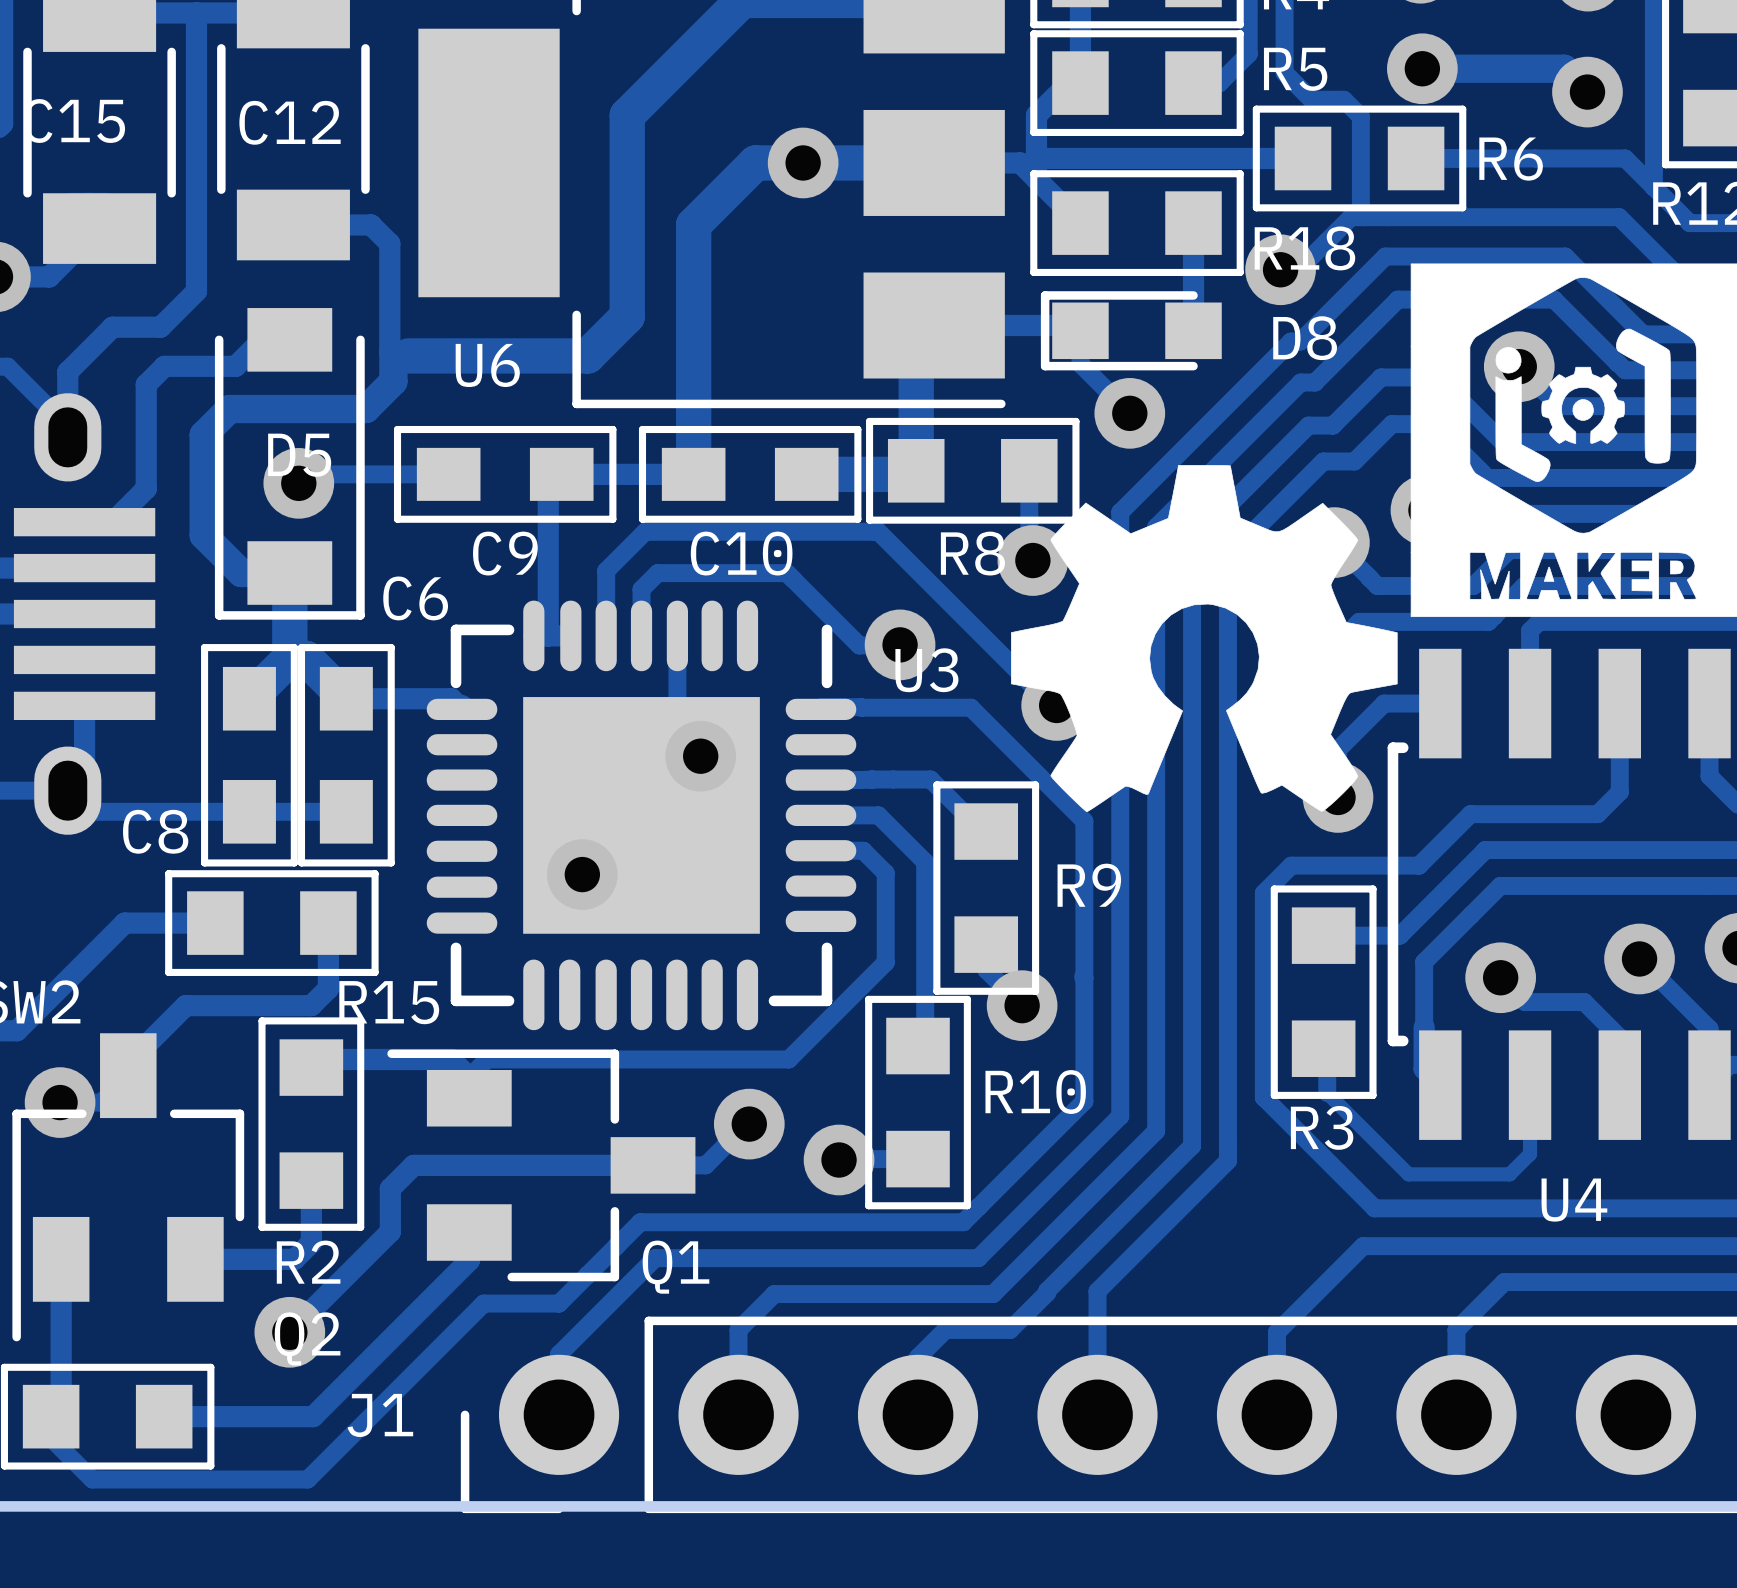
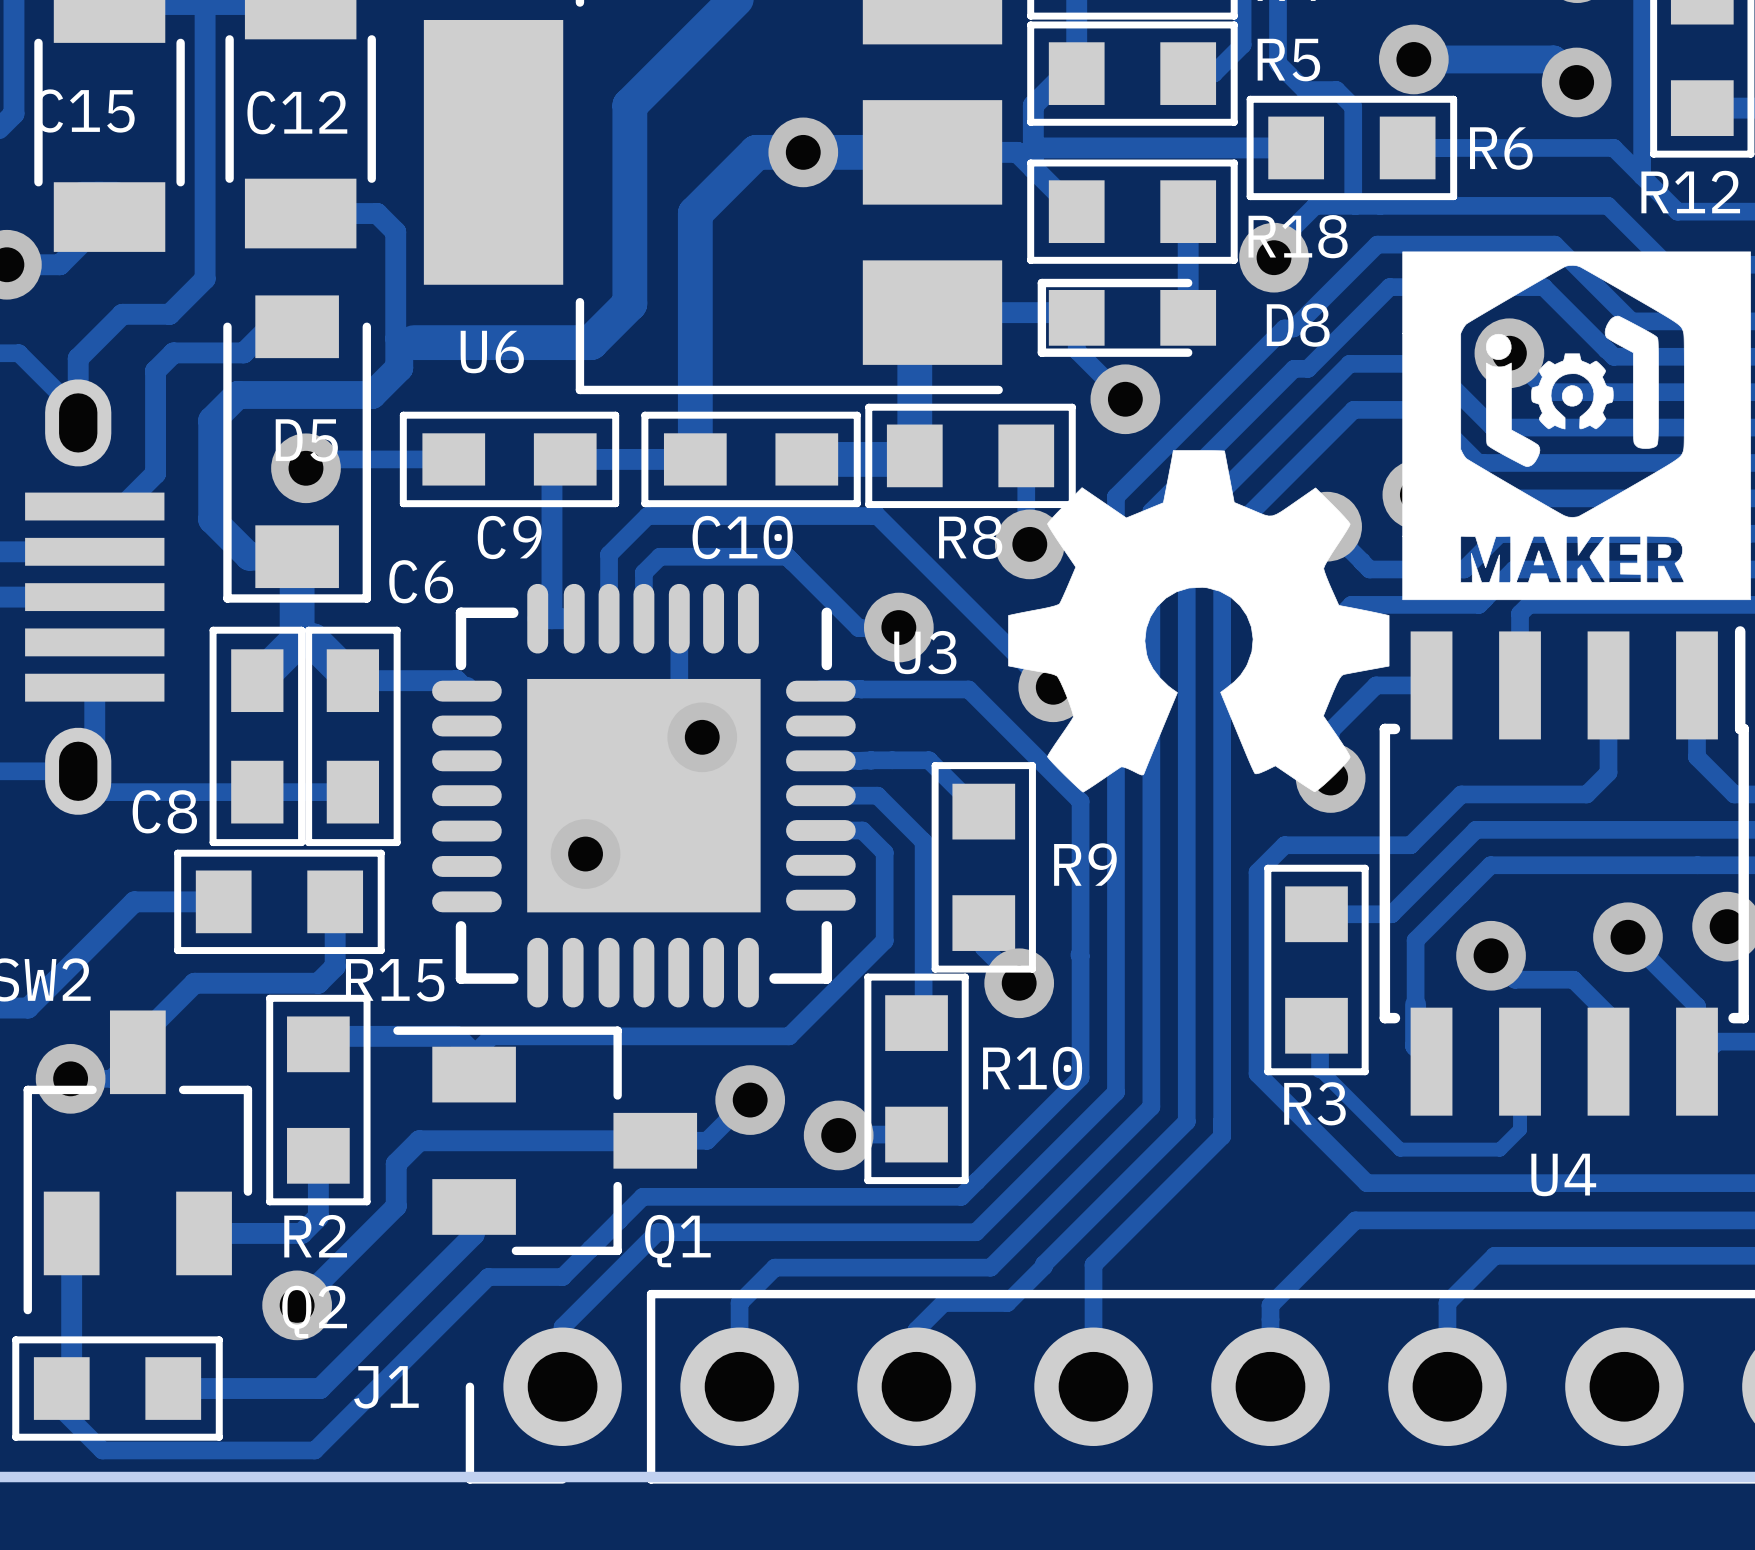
track: (1351, 217) (1298, 269) -> (1343, 205) (1315, 205) (1275, 245)
track: (1381, 377) (1332, 425) (1308, 425) (1213, 521) -> (1373, 363) (1349, 363) (1208, 505)
track: (1391, 424) (1354, 461) (1323, 461) (1227, 556) -> (1383, 409) (1353, 409) (1222, 540)

